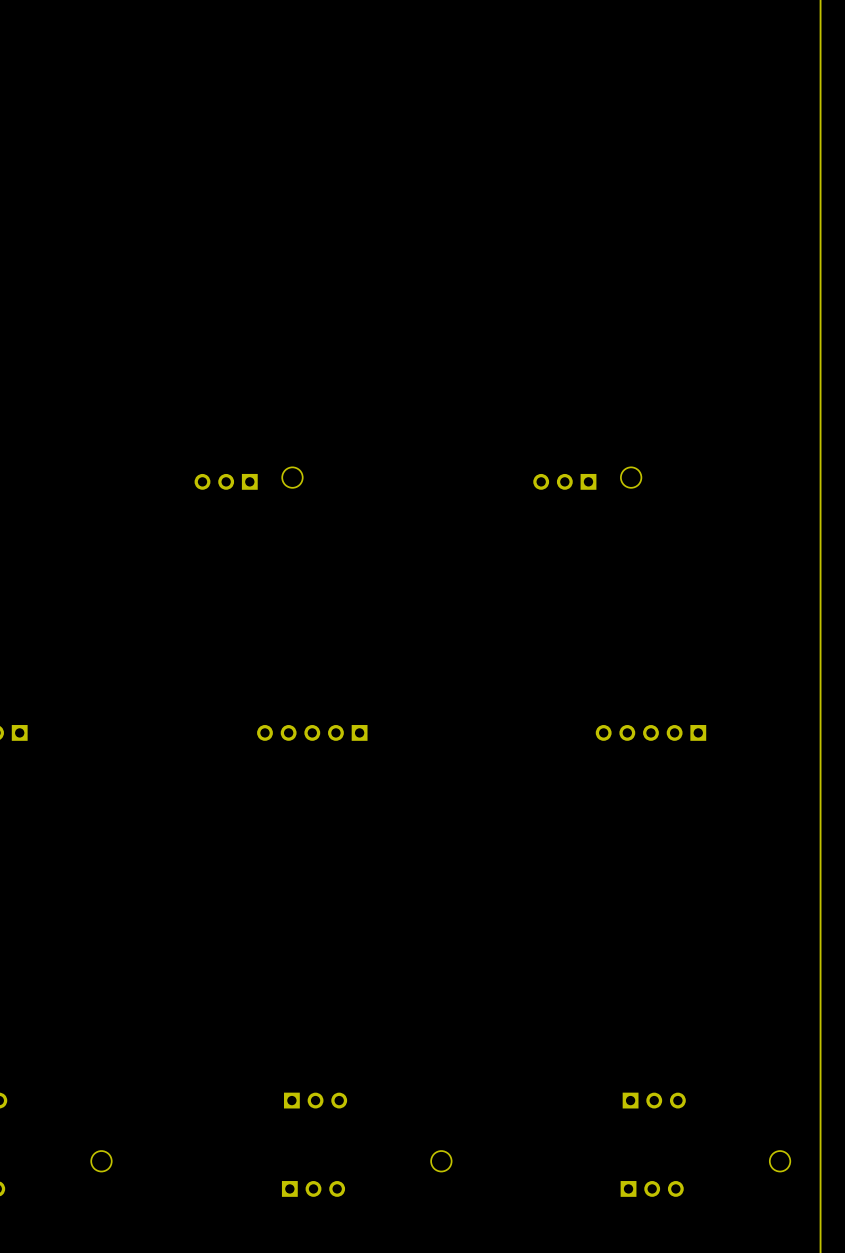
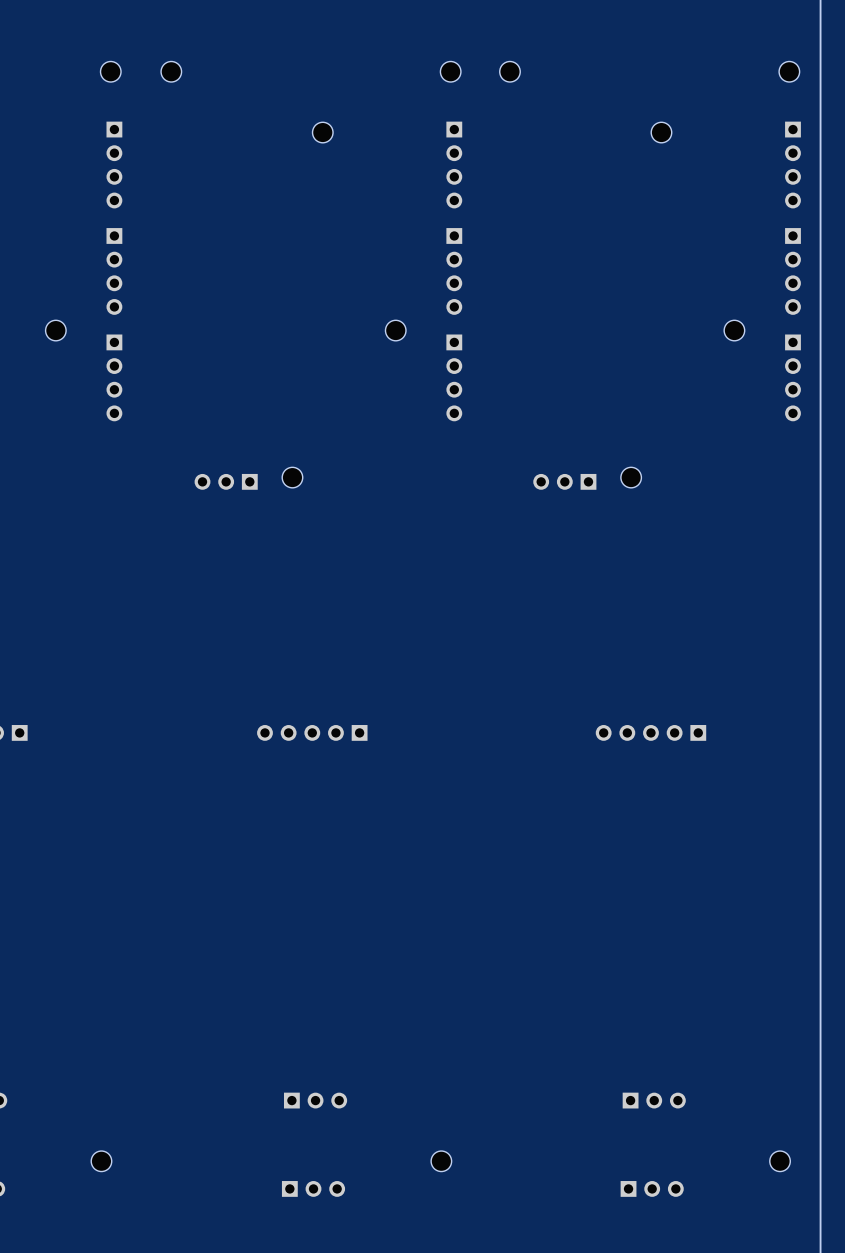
part: none -> (110, 71)
part: none -> (171, 71)
part: none -> (450, 71)
part: none -> (509, 71)
part: none -> (789, 71)
part: none -> (322, 132)
part: none -> (661, 132)
part: none -> (114, 165)
part: none -> (454, 165)
part: none -> (792, 165)
part: none -> (114, 271)
part: none -> (454, 271)
part: none -> (792, 271)
part: none -> (55, 330)
part: none -> (395, 330)
part: none -> (734, 330)
part: none -> (114, 377)
part: none -> (454, 377)
part: none -> (792, 377)

